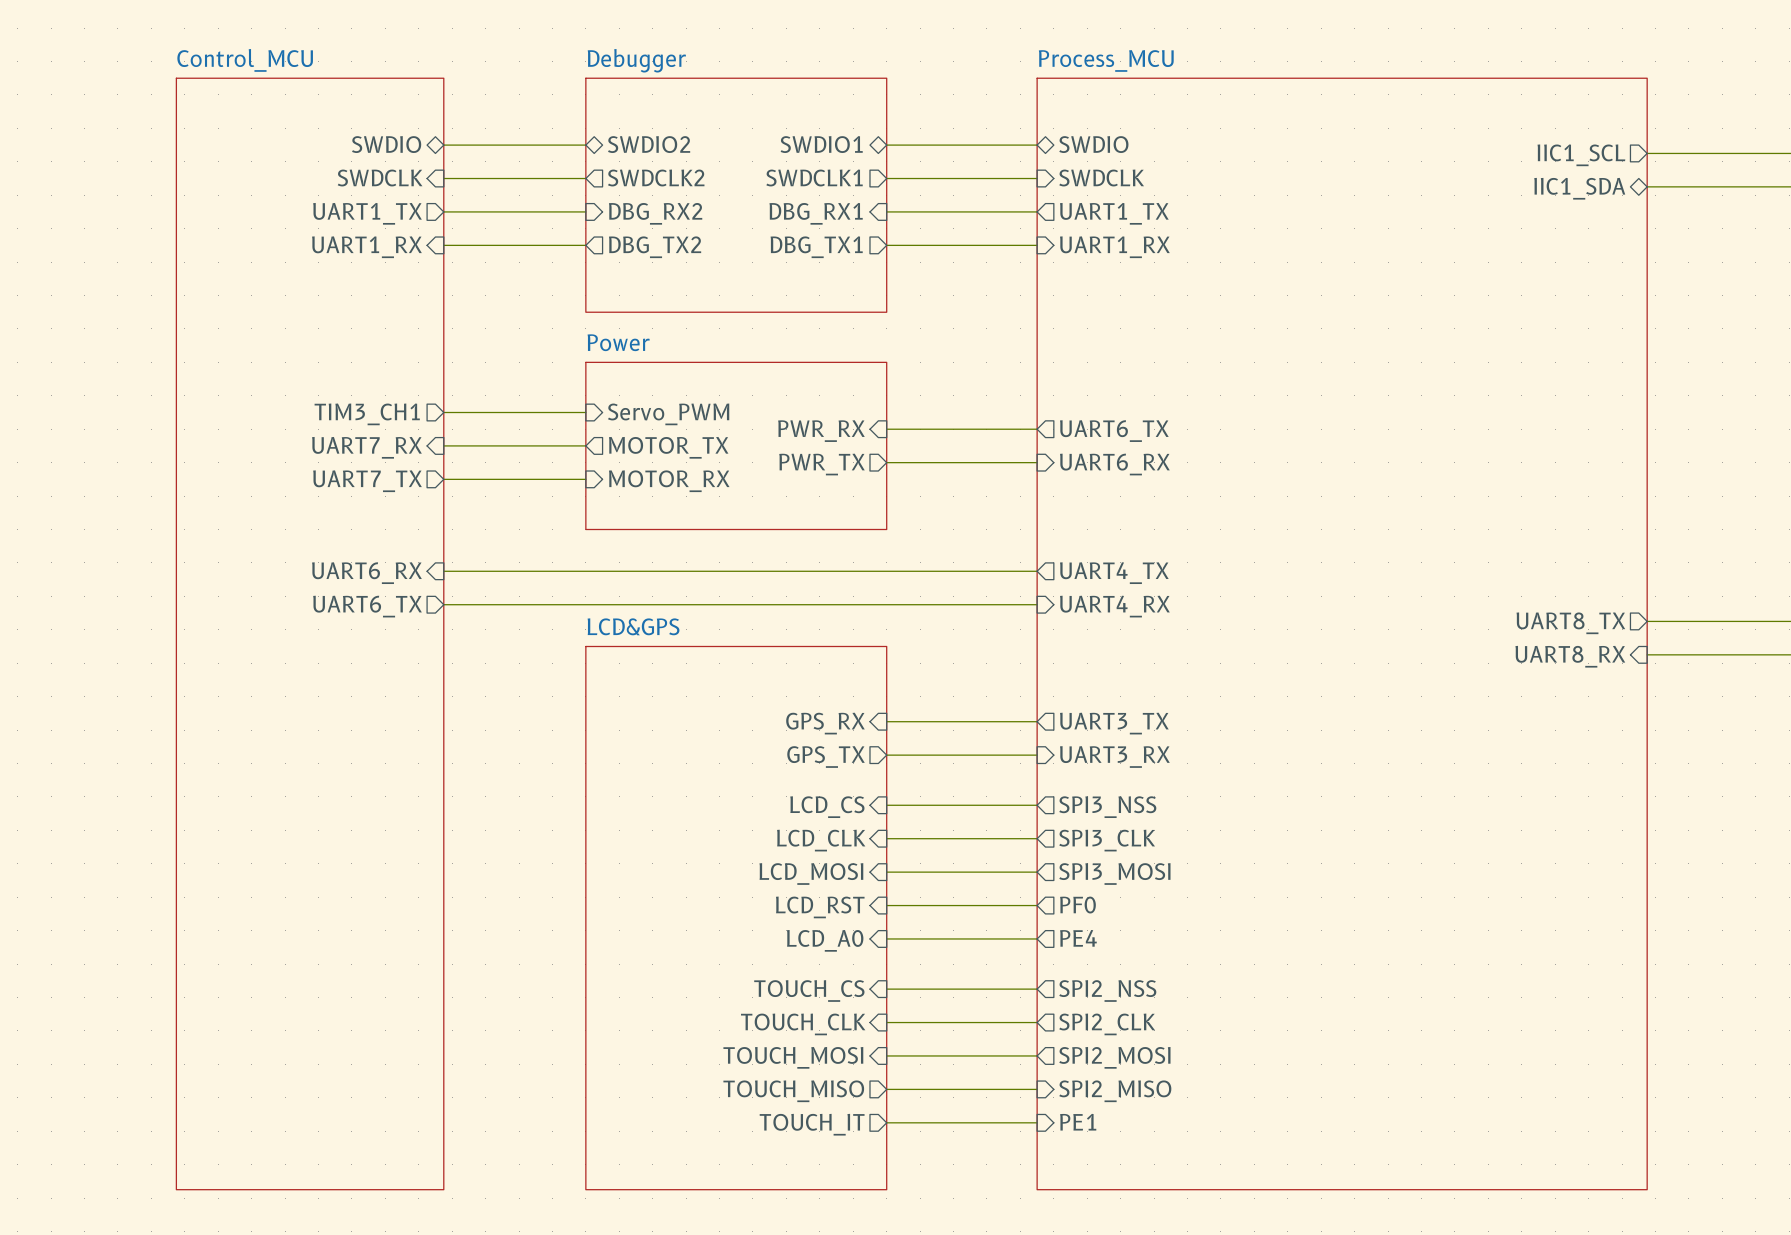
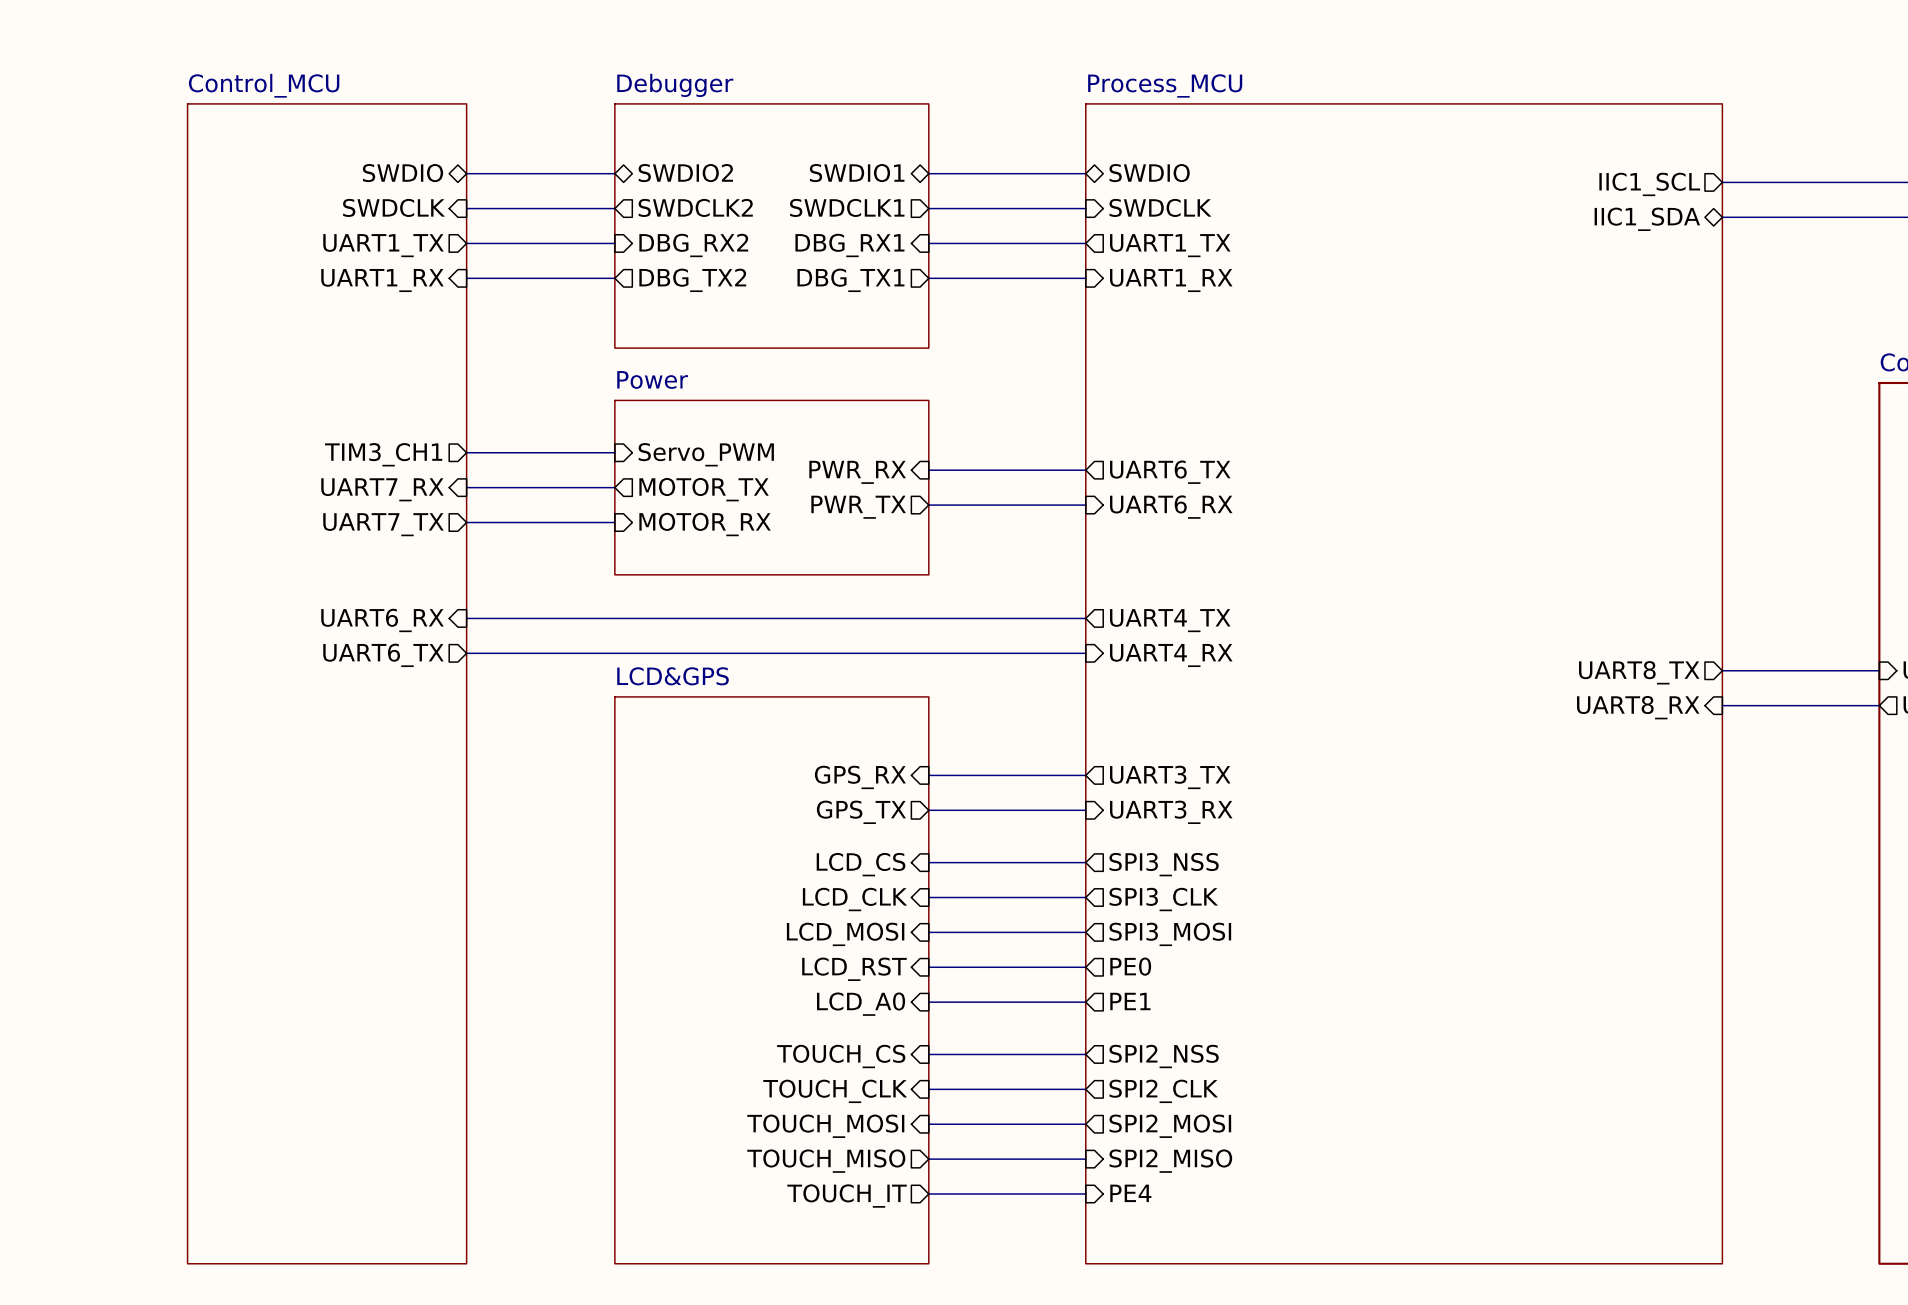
sheet pin: PF0 (1077, 905) -> PE0 (1130, 966)
sheet pin: PE4 (1078, 938) -> PE1 (1130, 1001)
sheet pin: PE1 (1078, 1122) -> PE4 (1130, 1193)

